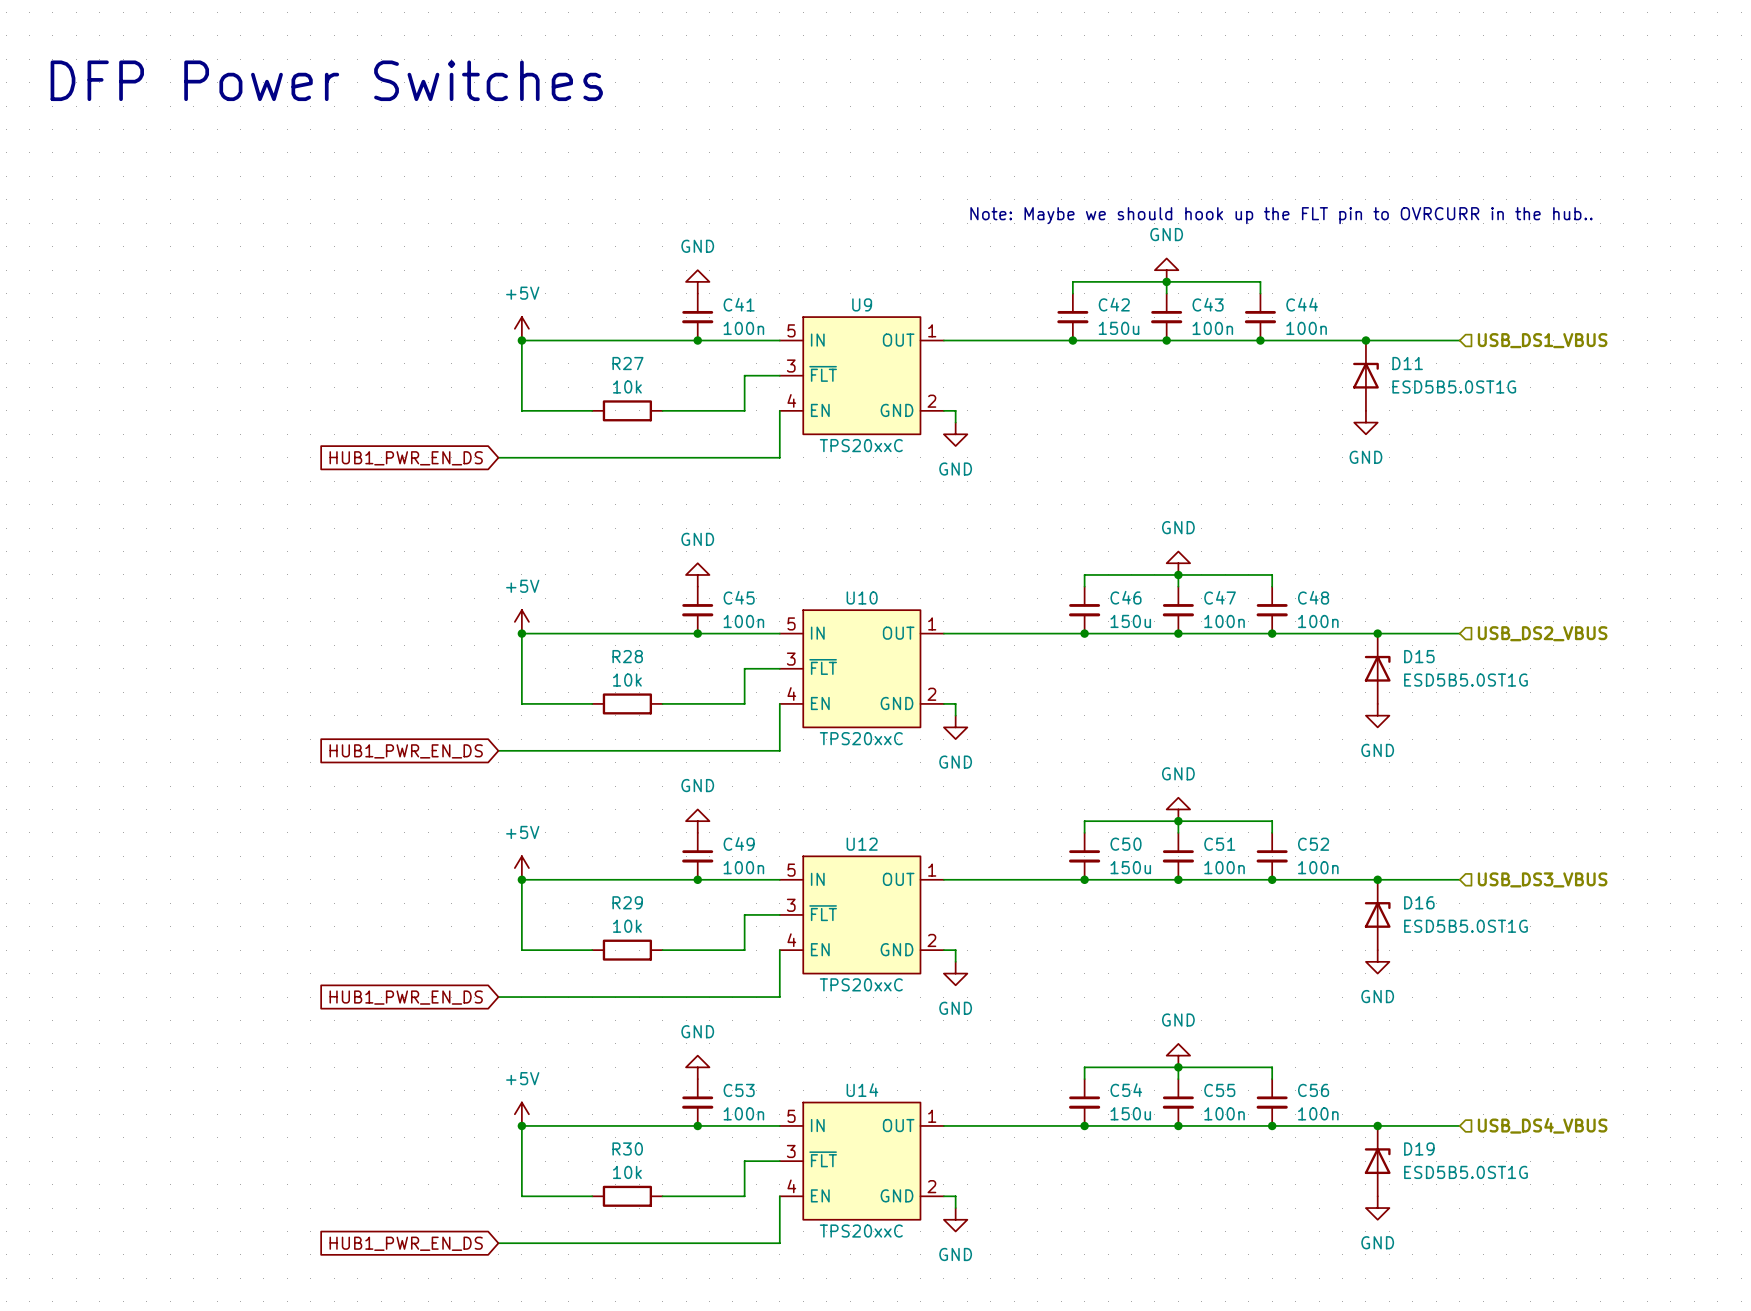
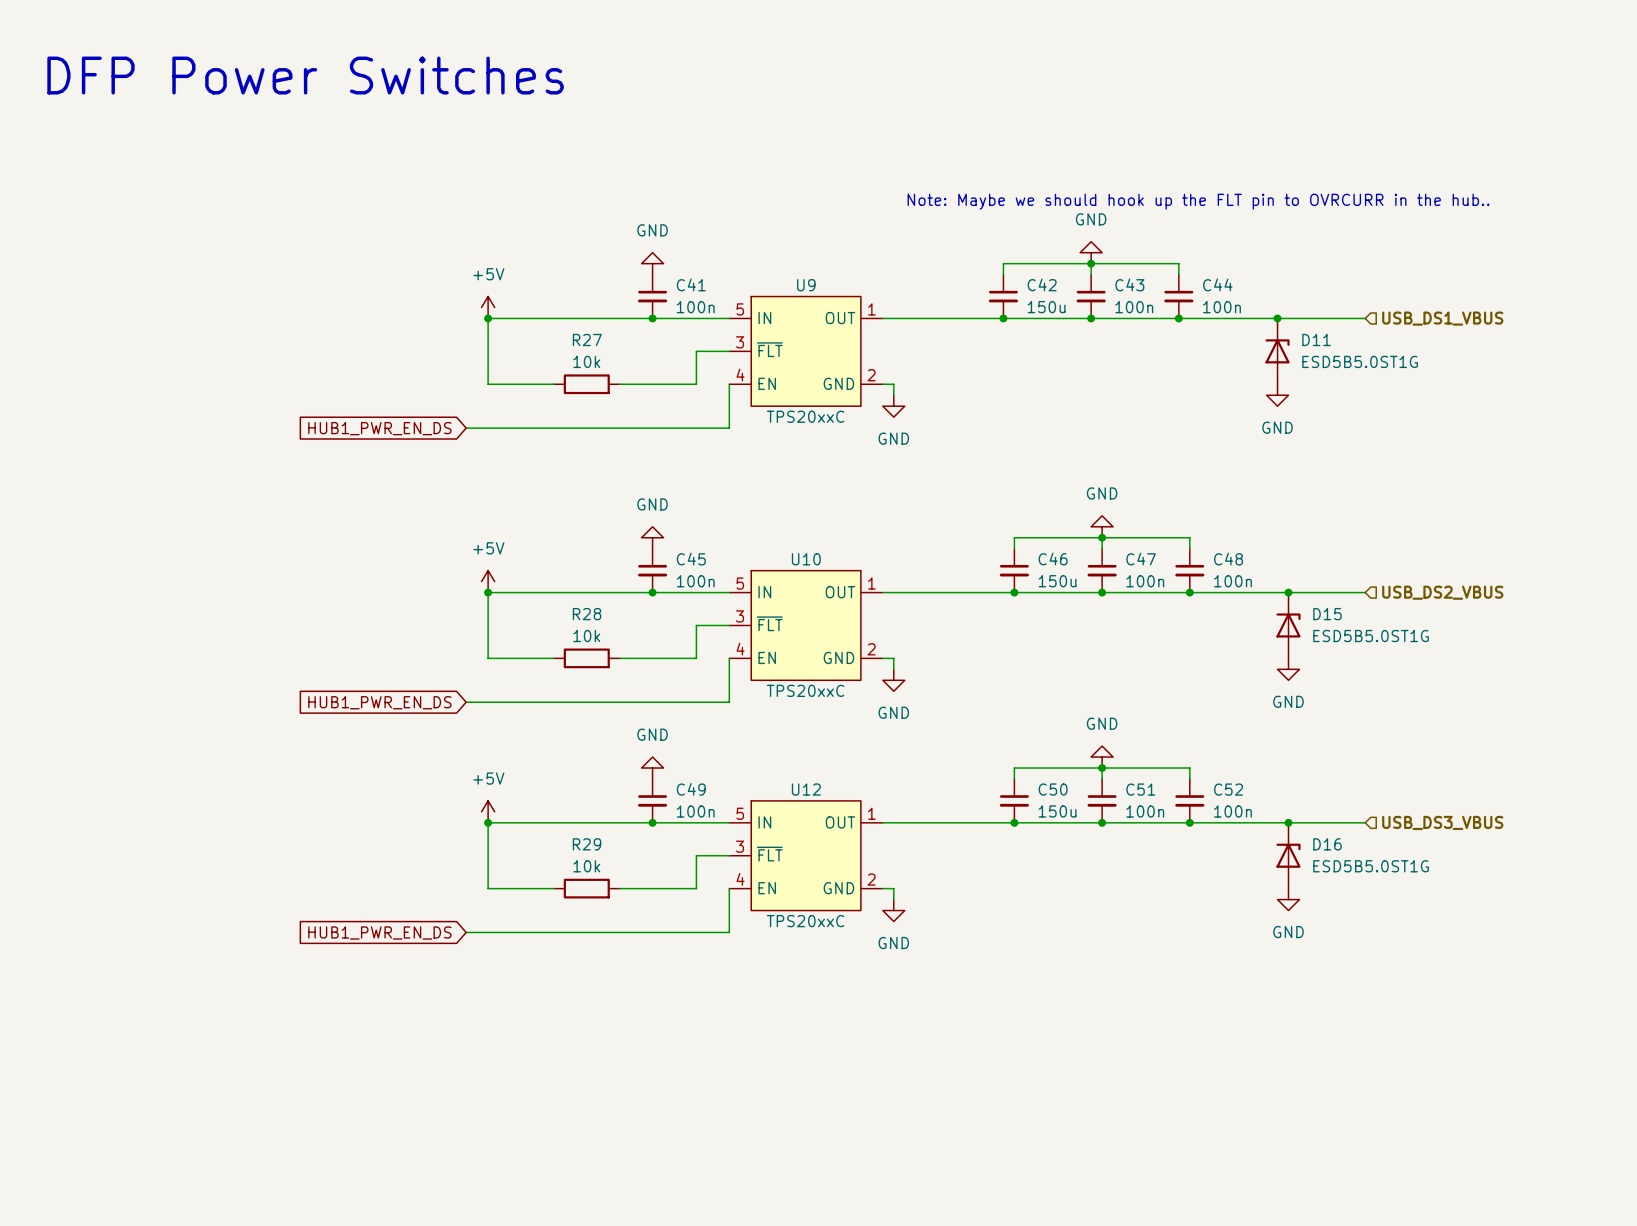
power symbol: GND (1178, 1055) -> none
power symbol: GND (697, 1067) -> none
wire: (1178, 1067) (1178, 1079) -> none
junction: (1178, 1067) -> none
wire: (1084, 1079) (1084, 1067) (1272, 1067) (1272, 1079) -> none
C53: 100n (697, 1102) -> none
C54: 150u (1084, 1102) -> none
C55: 100n (1178, 1102) -> none
C56: 100n (1272, 1102) -> none
power symbol: +5V (521, 1114) -> none
junction: (521, 1125) -> none
junction: (697, 1125) -> none
wire: (779, 1125) (521, 1125) (521, 1196) (592, 1196) -> none
wire: (943, 1125) (1459, 1125) -> none
junction: (1084, 1125) -> none
junction: (1178, 1125) -> none
junction: (1272, 1125) -> none
junction: (1377, 1125) -> none
hierarchical label: USB_DS4_VBUS (1542, 1125) -> none
wire: (779, 1161) (744, 1161) (744, 1196) (662, 1196) -> none
U14: TPS20xxC (861, 1161) -> none
D19: ESD5B5.0ST1G (1377, 1161) -> none
R30: 10k (627, 1196) -> none
wire: (779, 1196) (779, 1243) (498, 1243) -> none
wire: (943, 1196) (955, 1196) (955, 1208) -> none
power symbol: GND (1377, 1208) -> none
power symbol: GND (955, 1219) -> none
global label: HUB1_PWR_EN_DS (406, 1243) -> none

